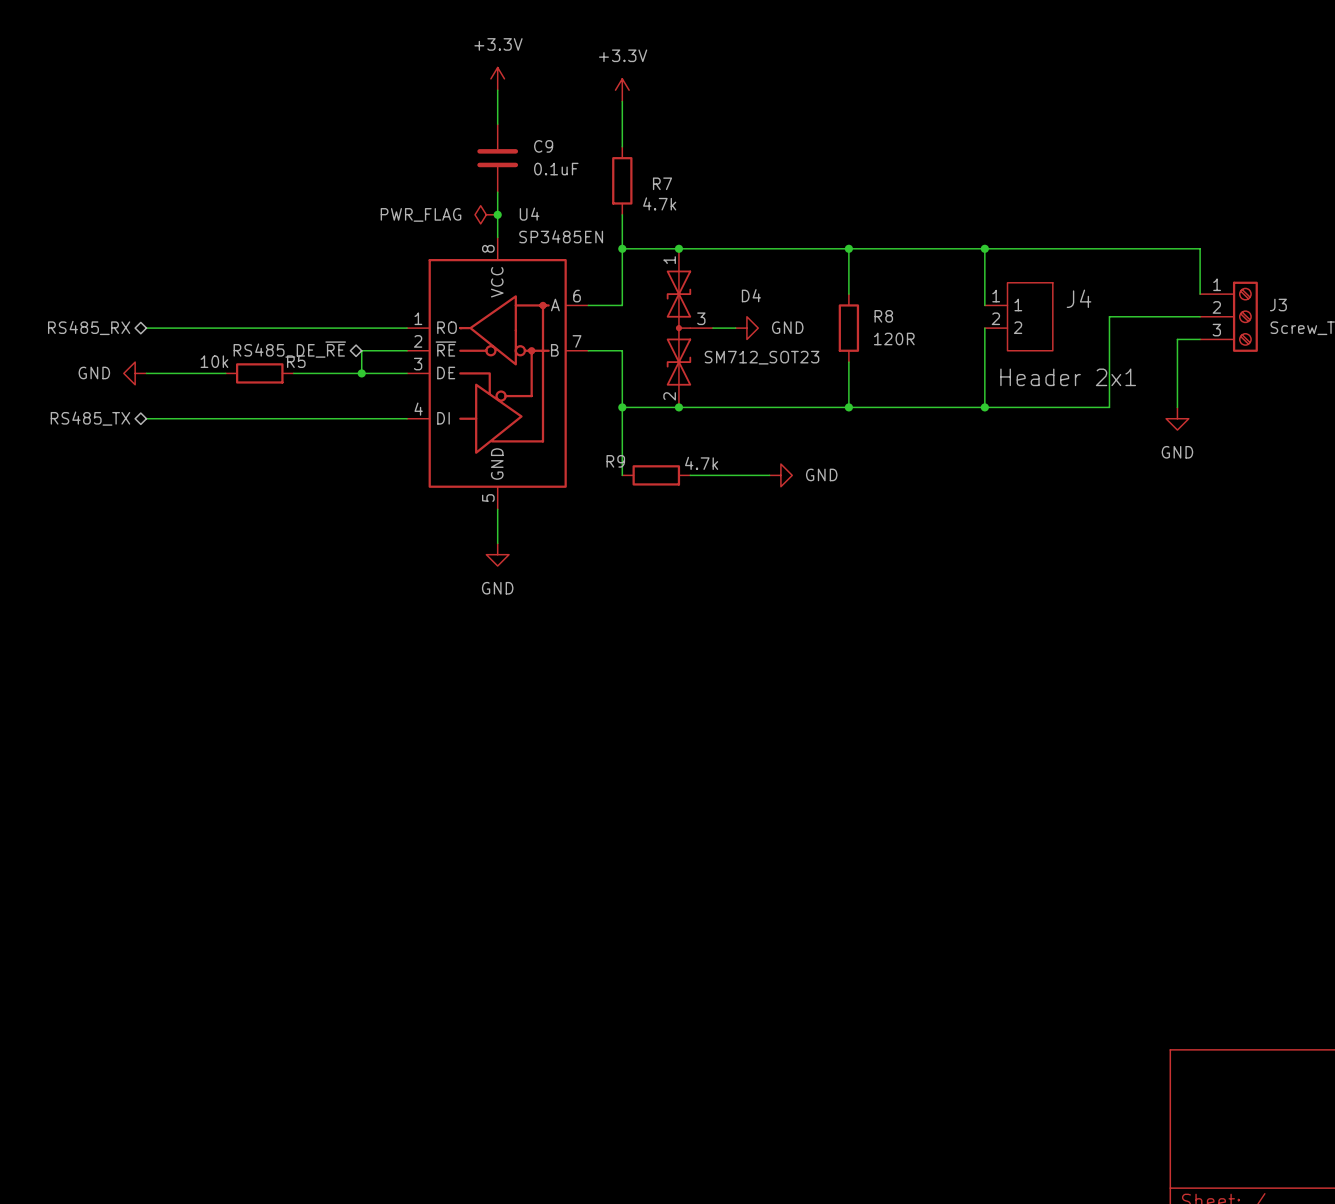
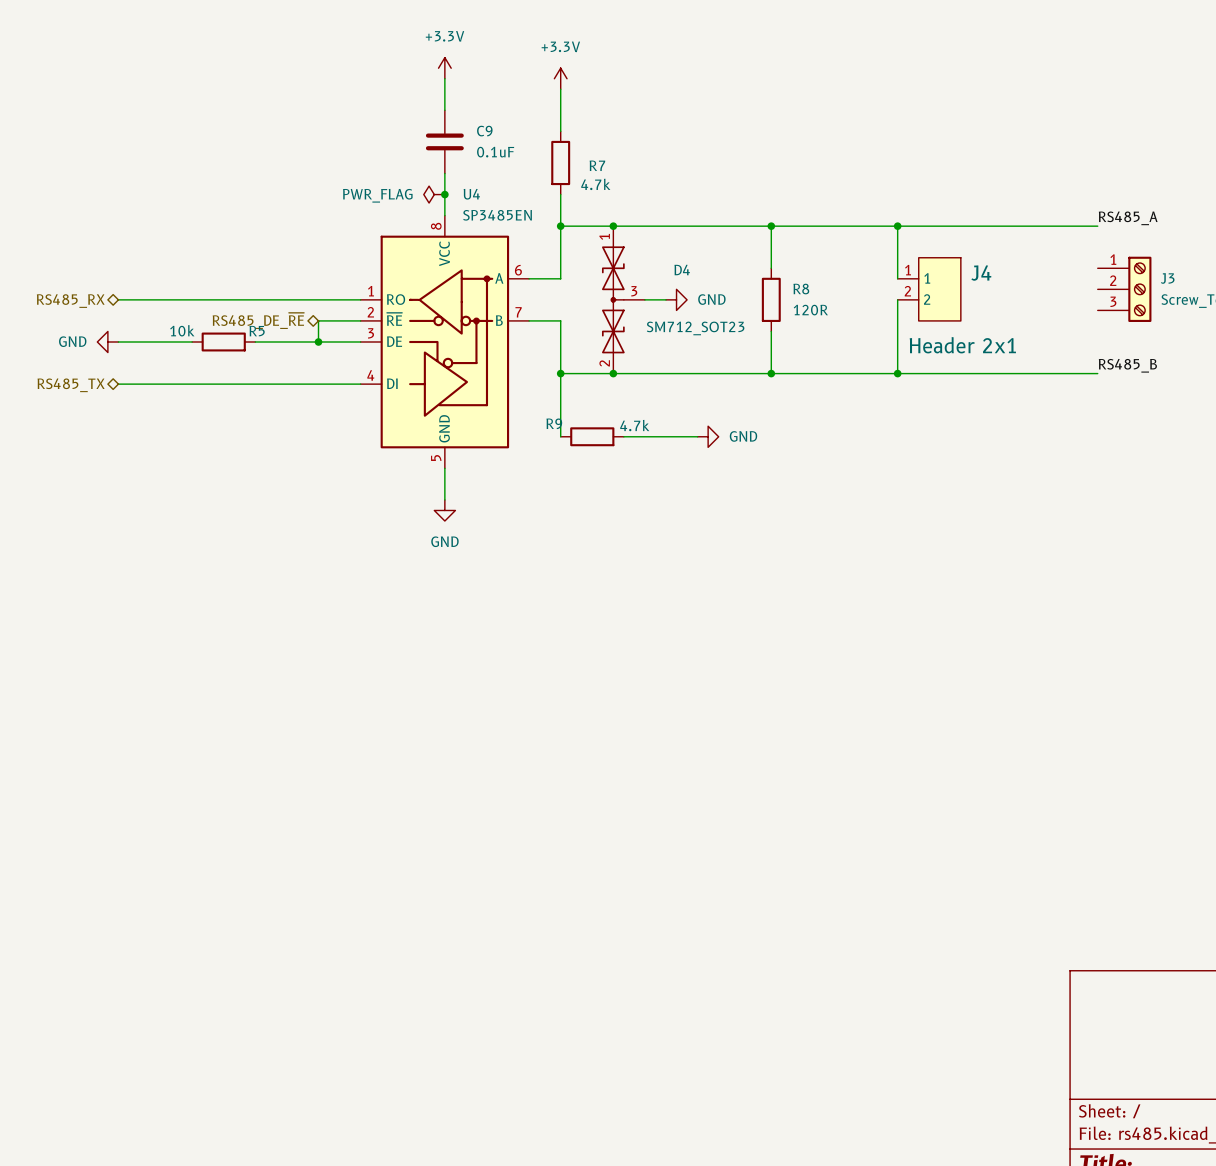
label: none -> RS485_A (1128, 218)
wire: (1200, 248) (1200, 294) -> none
wire: (1200, 316) (1109, 316) (1109, 407) -> (1097, 373) (1013, 373)
wire: (1200, 339) (1177, 339) (1177, 407) -> none
label: none -> RS485_B (1127, 365)
power symbol: GND (1177, 418) -> none

